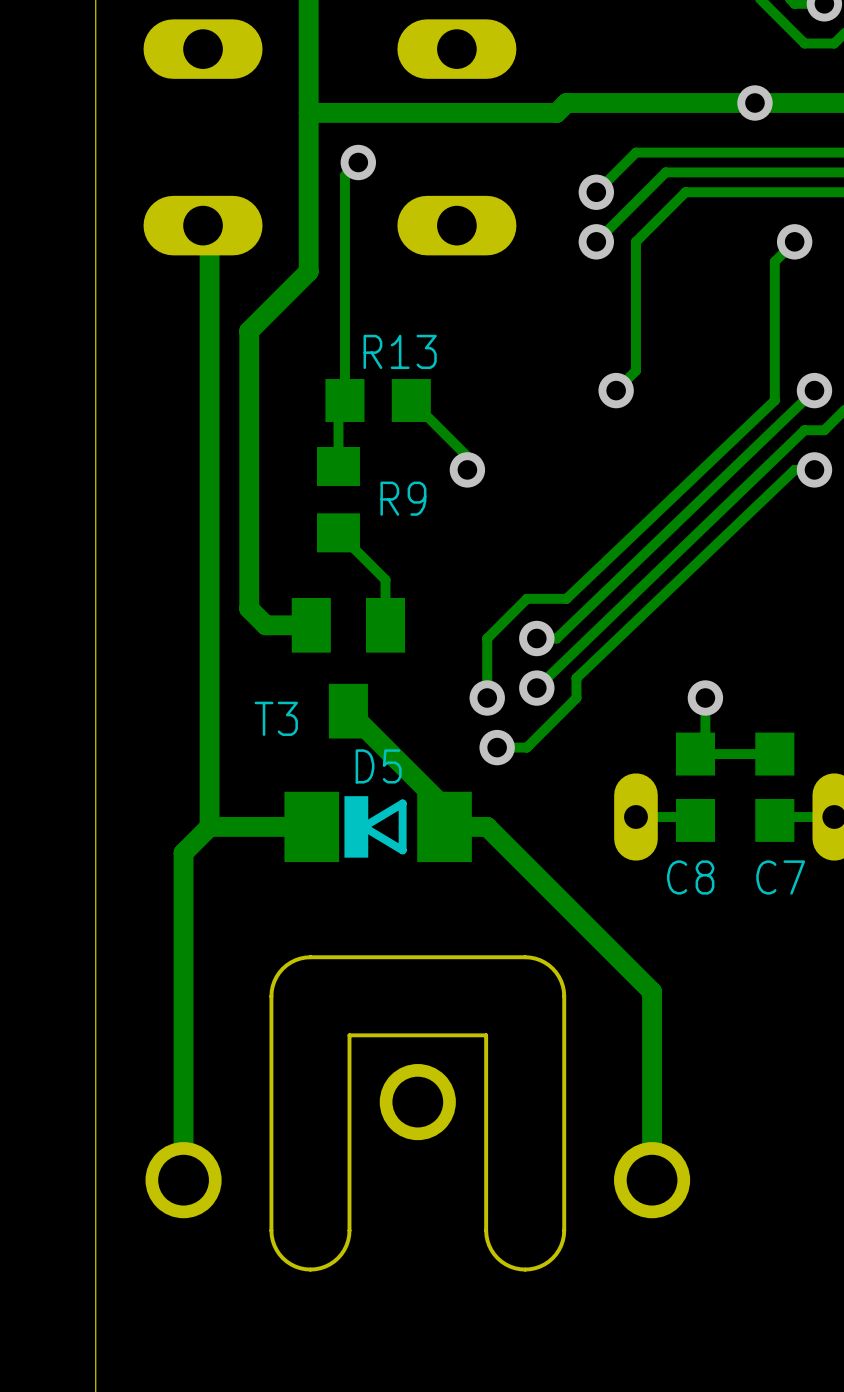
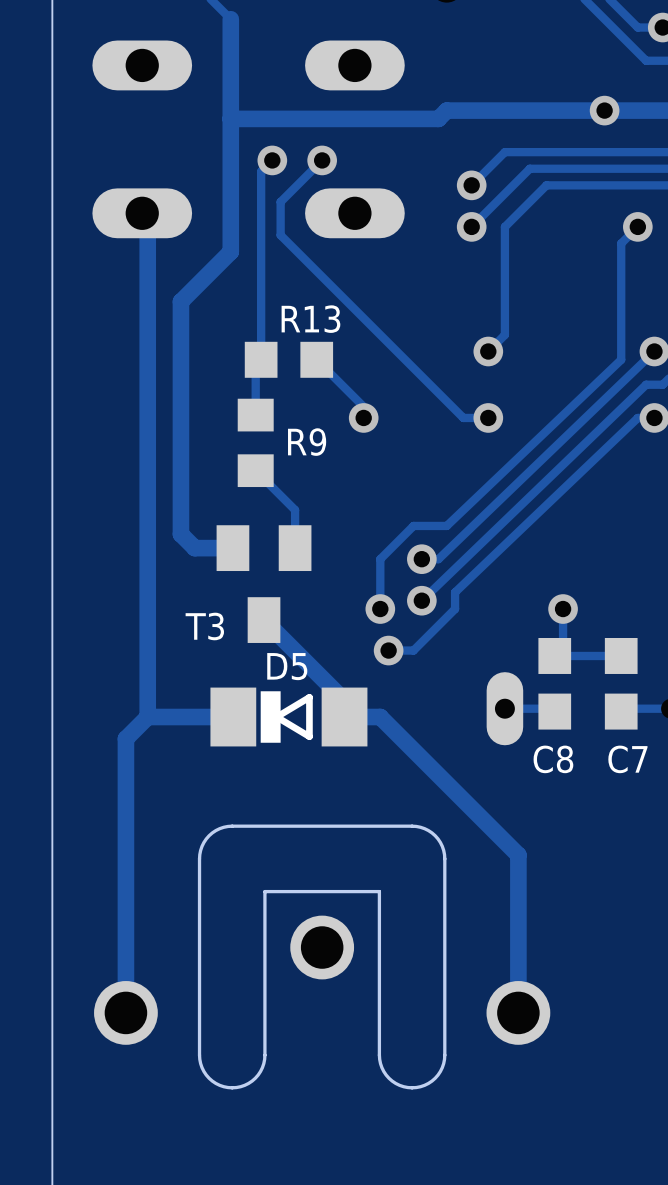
track: none -> (322, 160) (280, 201) (280, 235) (463, 417) (488, 417)
via: none -> (322, 160)
via: none -> (488, 417)

